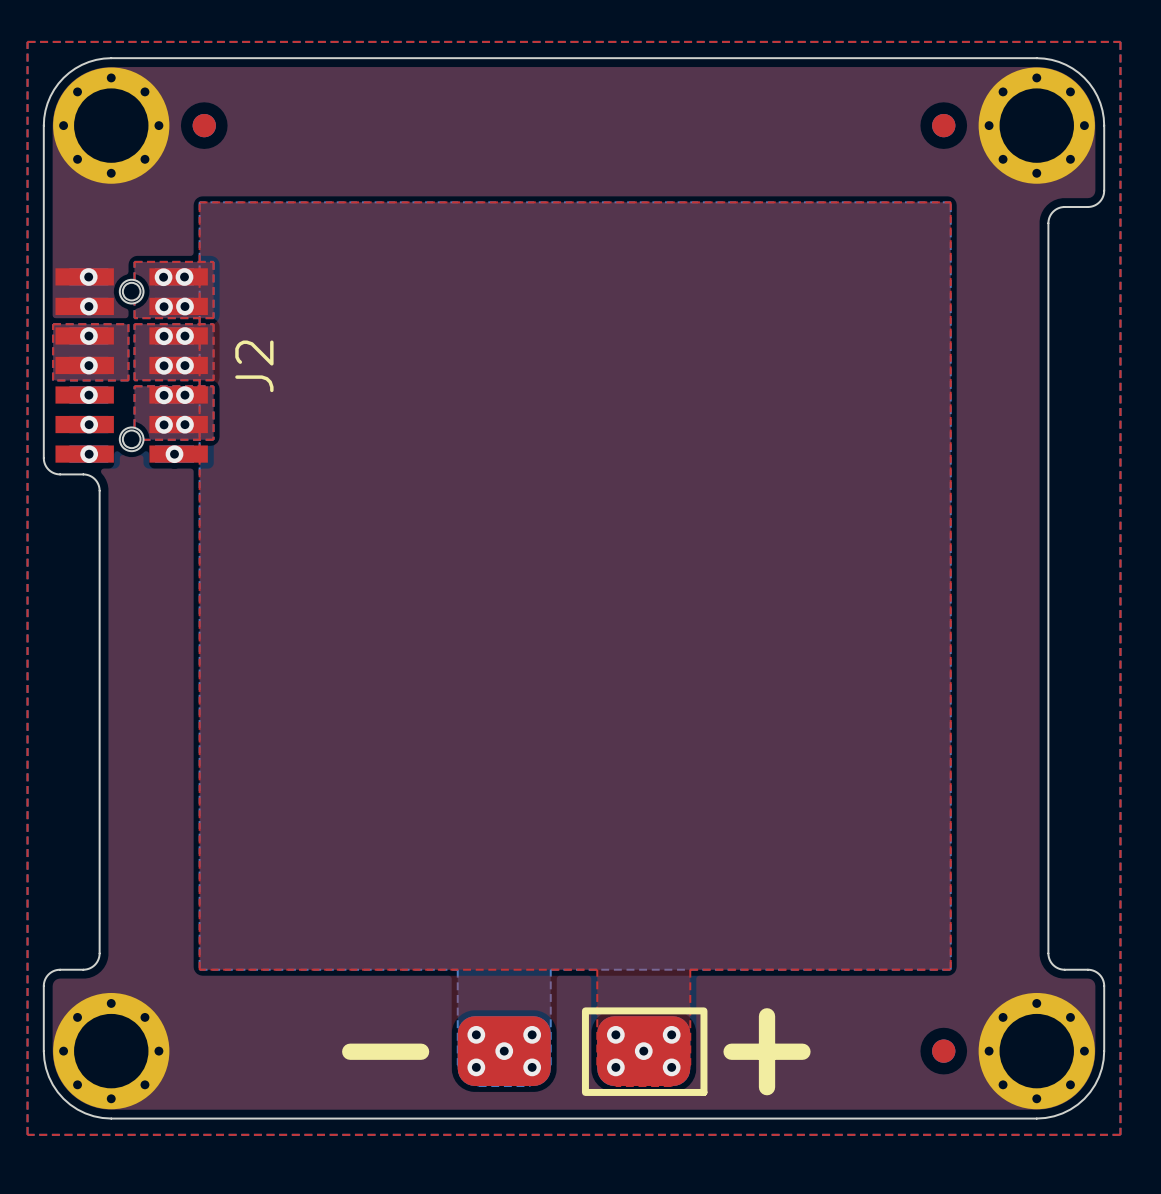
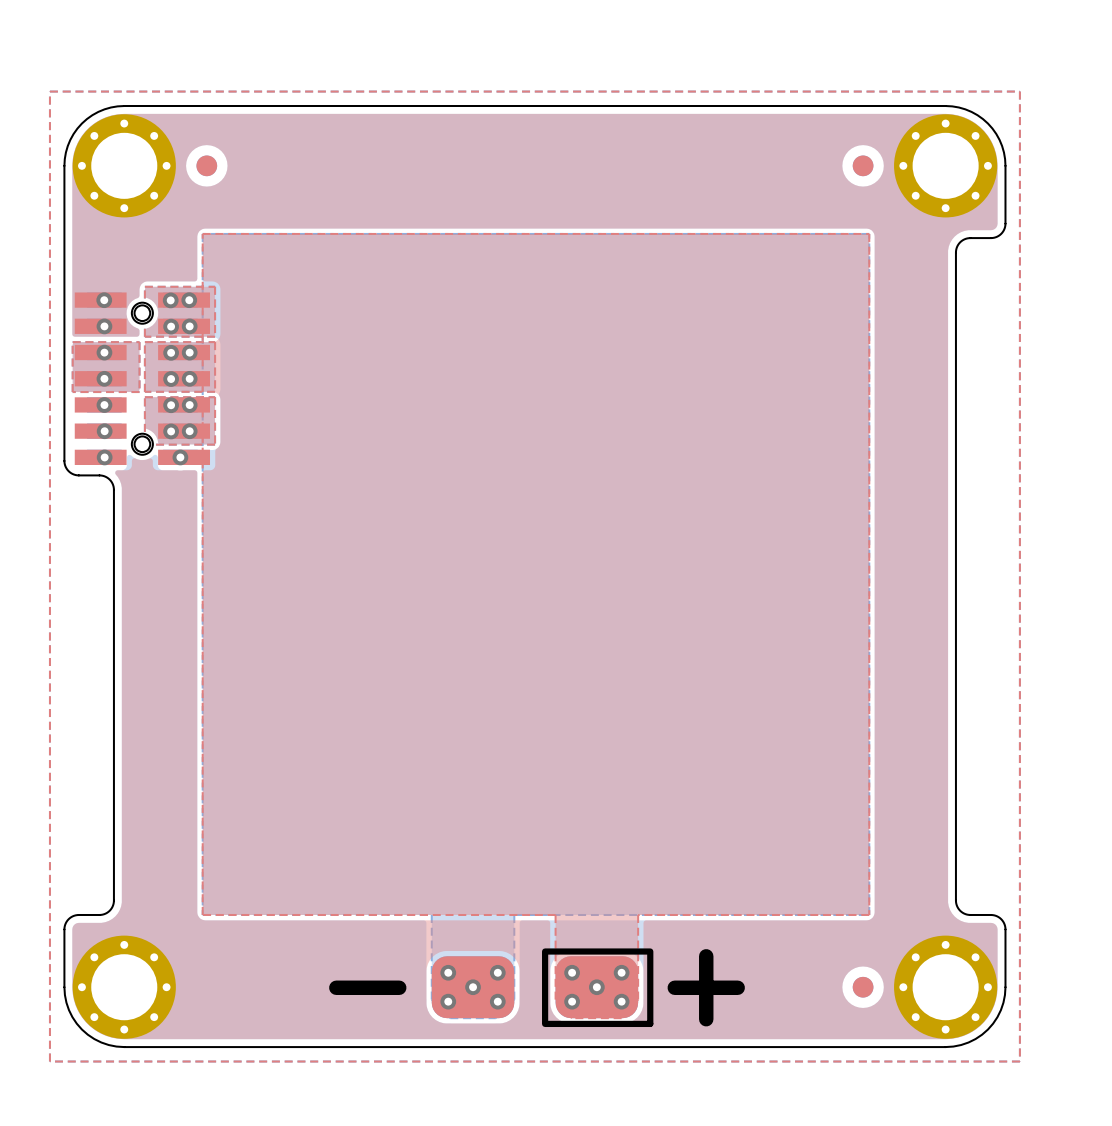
J2 name: J2 (254, 366) -> none

